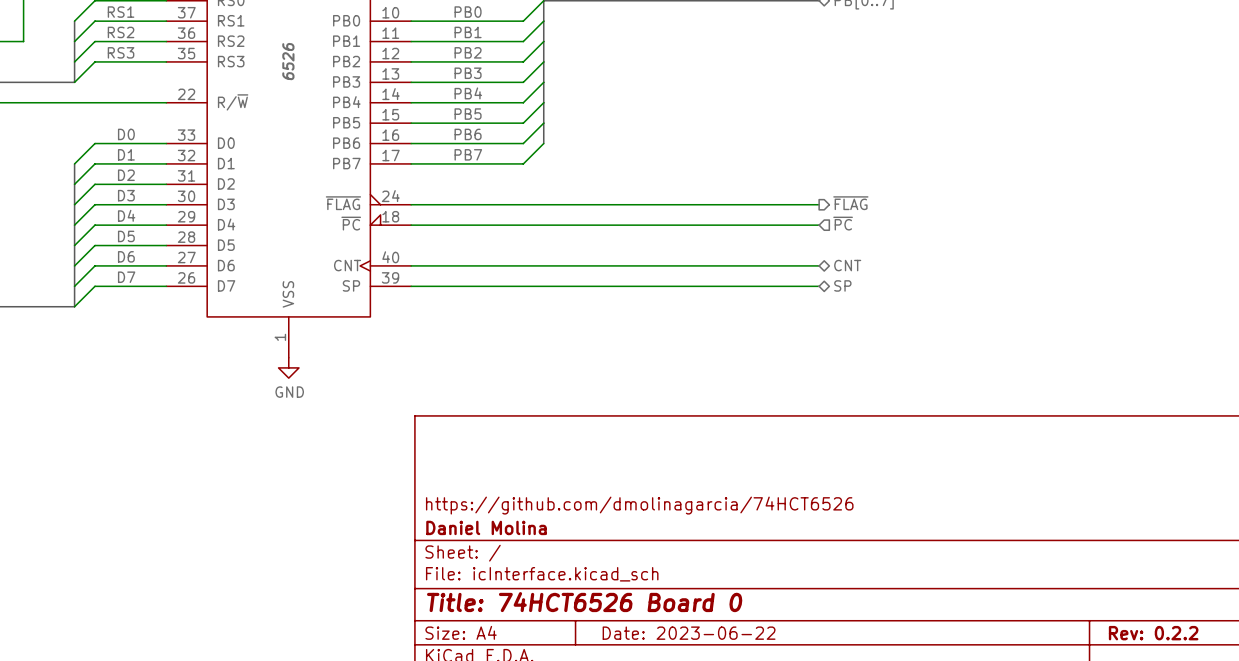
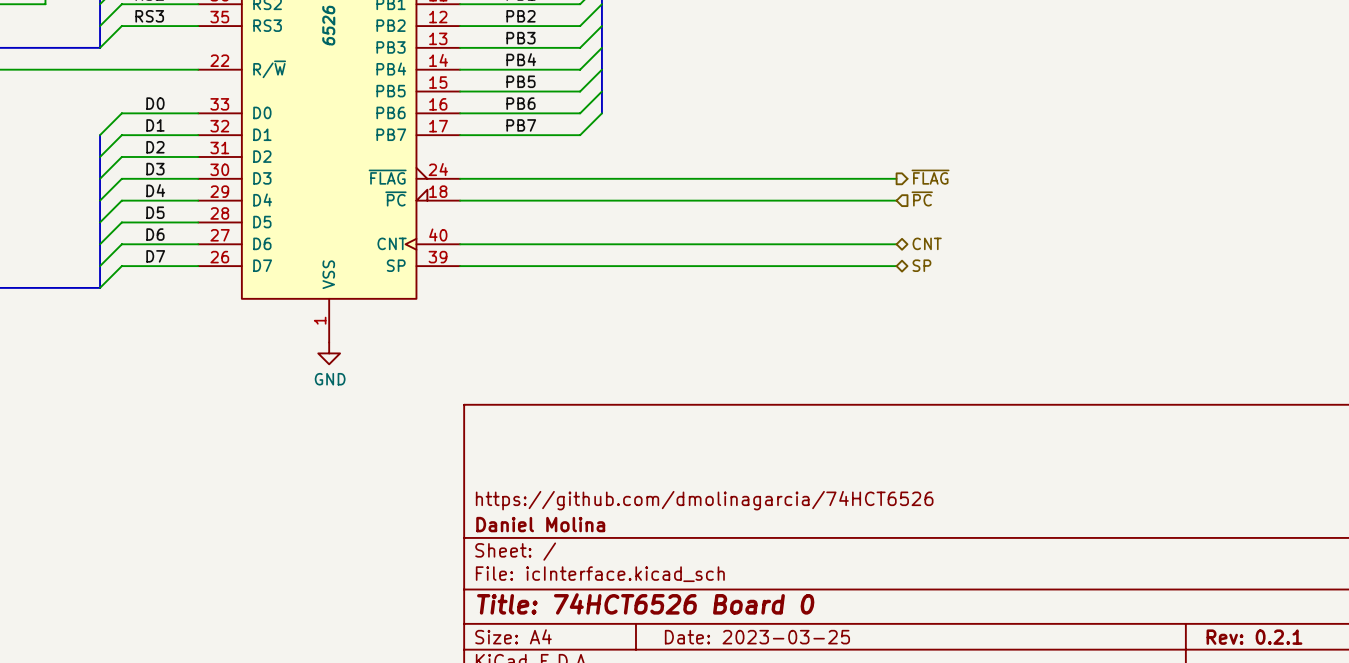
title block: Date: 2023-06-22 (689, 633) -> Date: 2023-03-25 (757, 637)
title block: Rev: 0.2.2 (1153, 633) -> Rev: 0.2.1 (1254, 637)

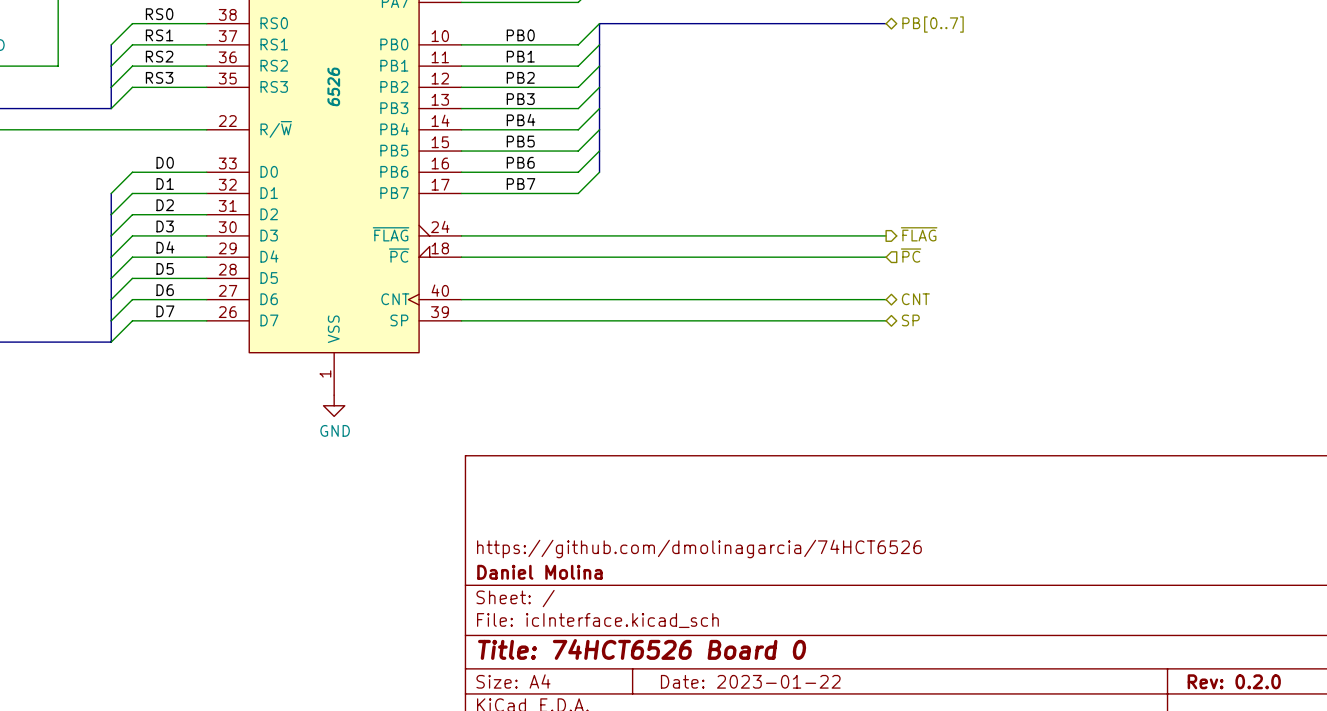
title block: Date: 2023-03-25 (757, 637) -> Date: 2023-01-22 (750, 681)
title block: Rev: 0.2.1 (1254, 637) -> Rev: 0.2.0 (1234, 681)

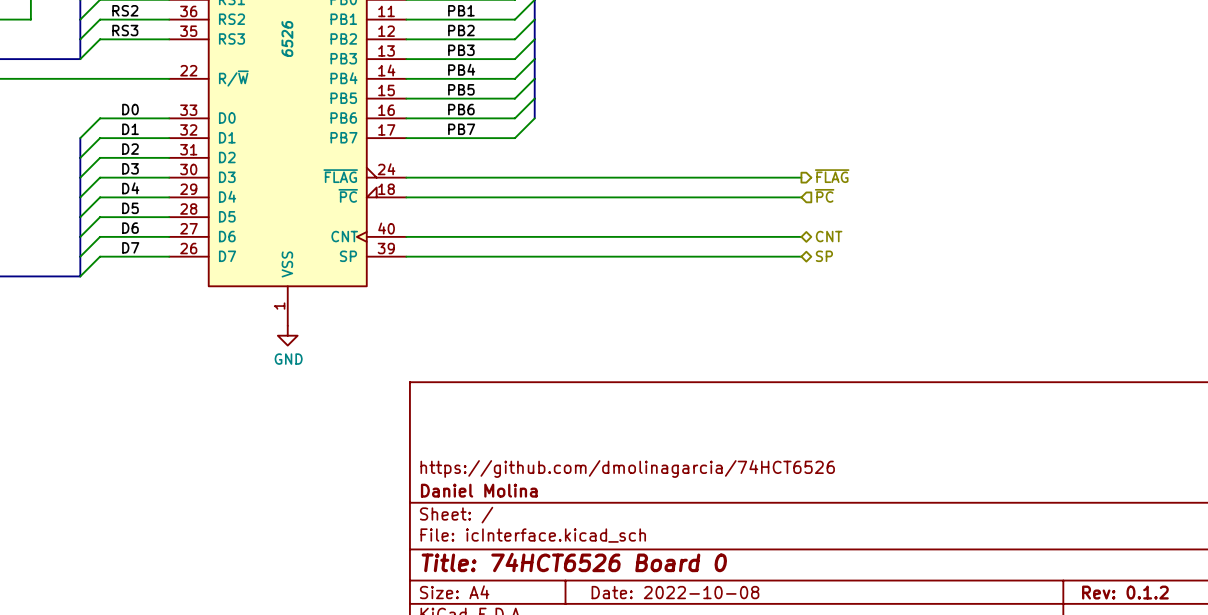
title block: Date: 2023-01-22 (750, 681) -> Date: 2022-10-08 (675, 592)
title block: Rev: 0.2.0 (1234, 681) -> Rev: 0.1.2 (1125, 592)

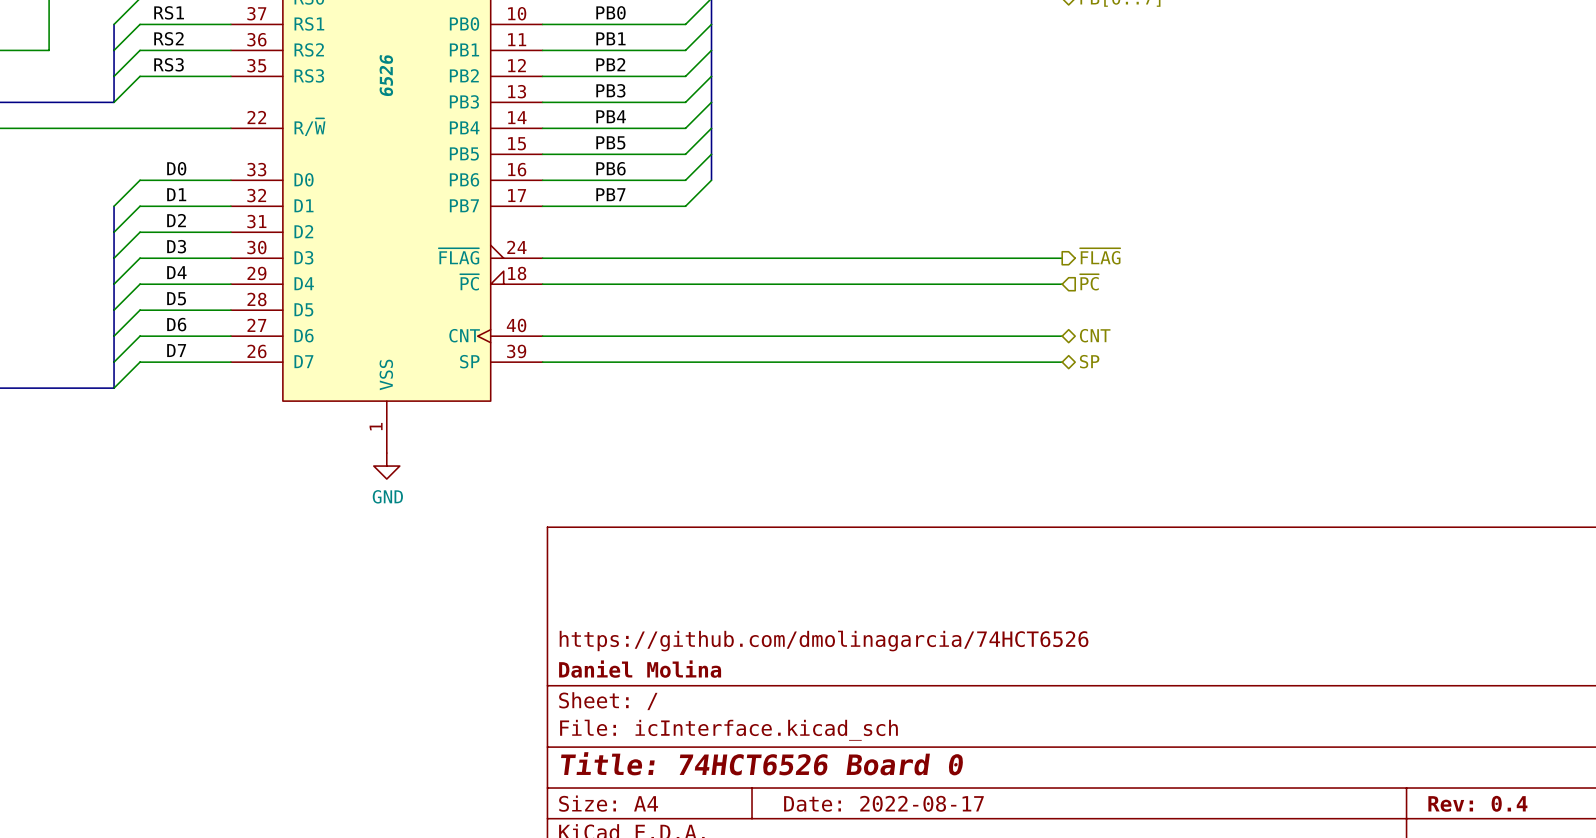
title block: Date: 2022-10-08 (675, 592) -> Date: 2022-08-17 (883, 803)
title block: Rev: 0.1.2 (1125, 592) -> Rev: 0.4 (1477, 803)

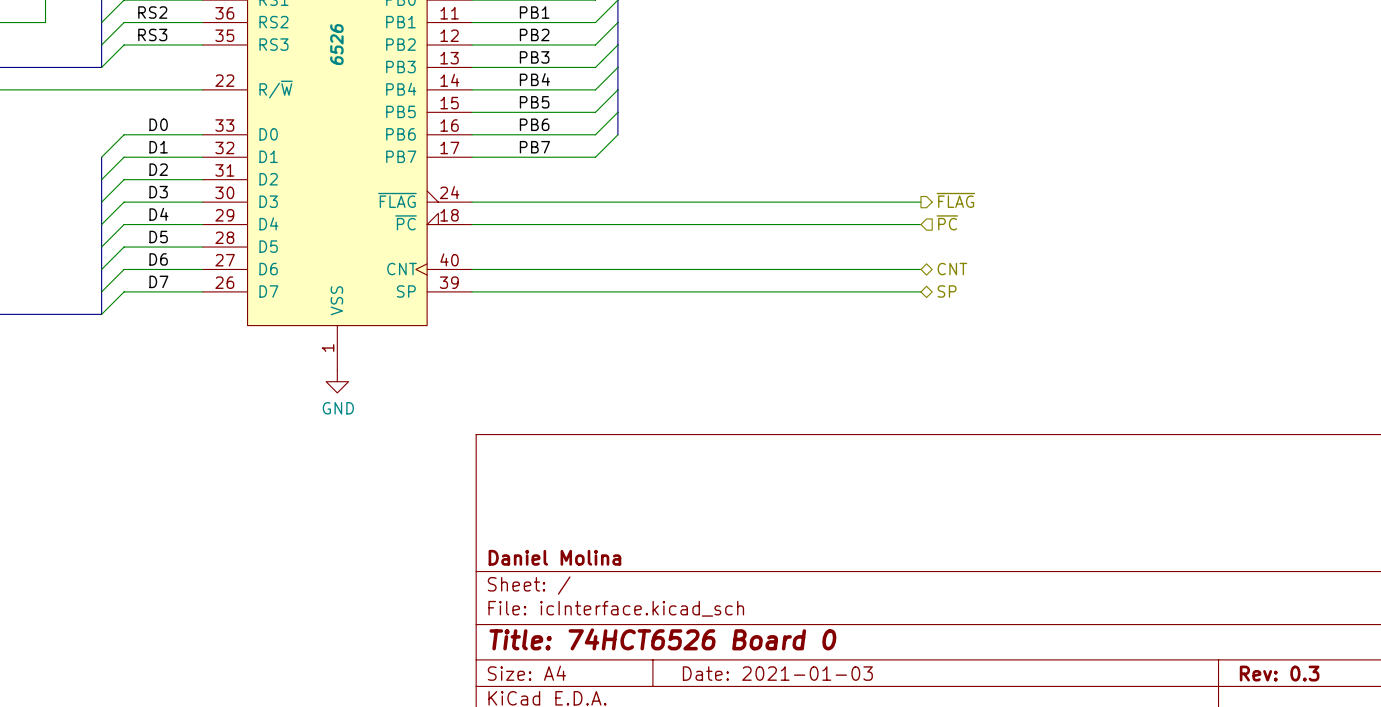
title block: https://github.com/dmolinagarcia/74HCT6526 (824, 641) -> none
title block: Date: 2022-08-17 (883, 803) -> Date: 2021-01-03 (777, 673)
title block: Rev: 0.4 (1477, 803) -> Rev: 0.3 (1279, 673)

